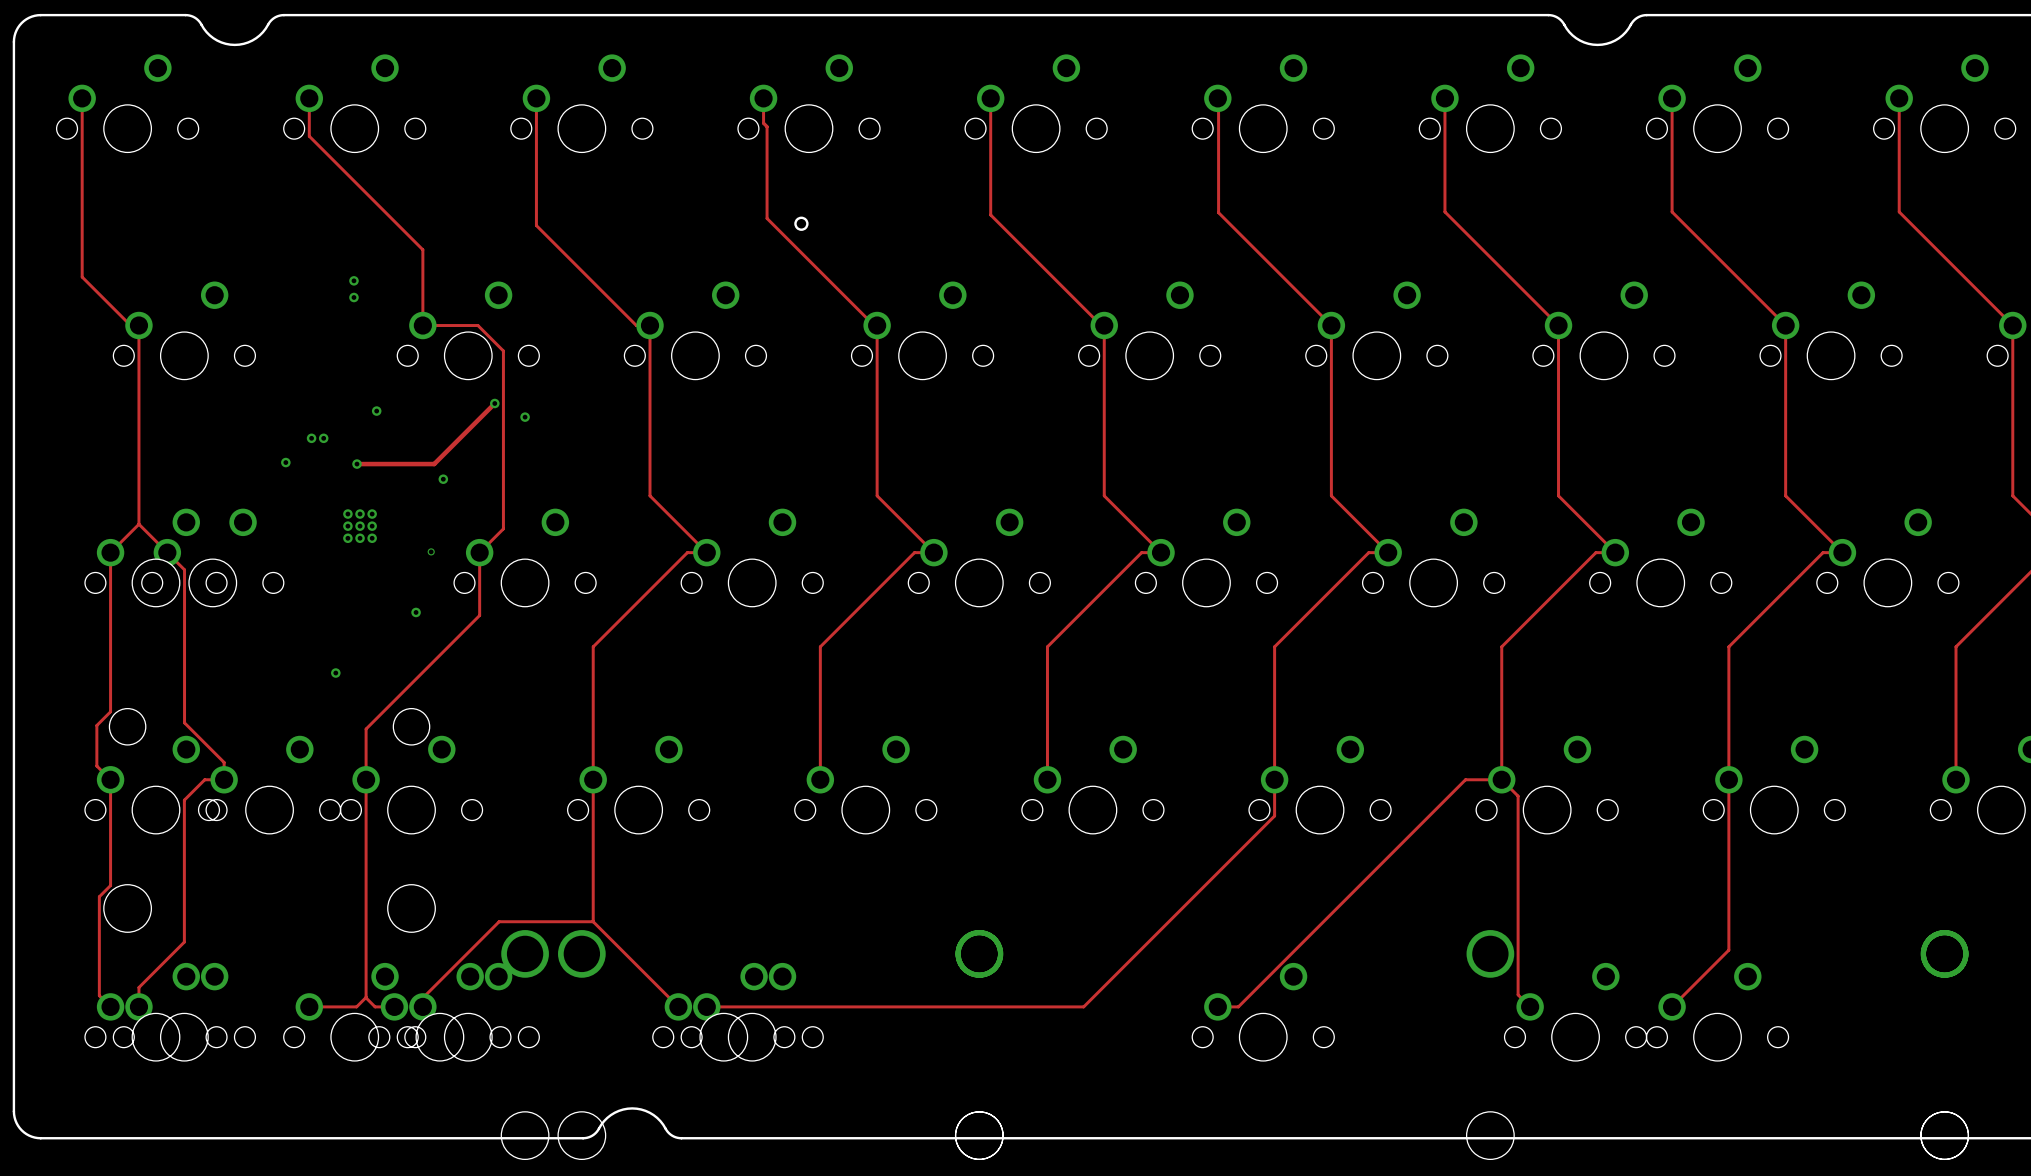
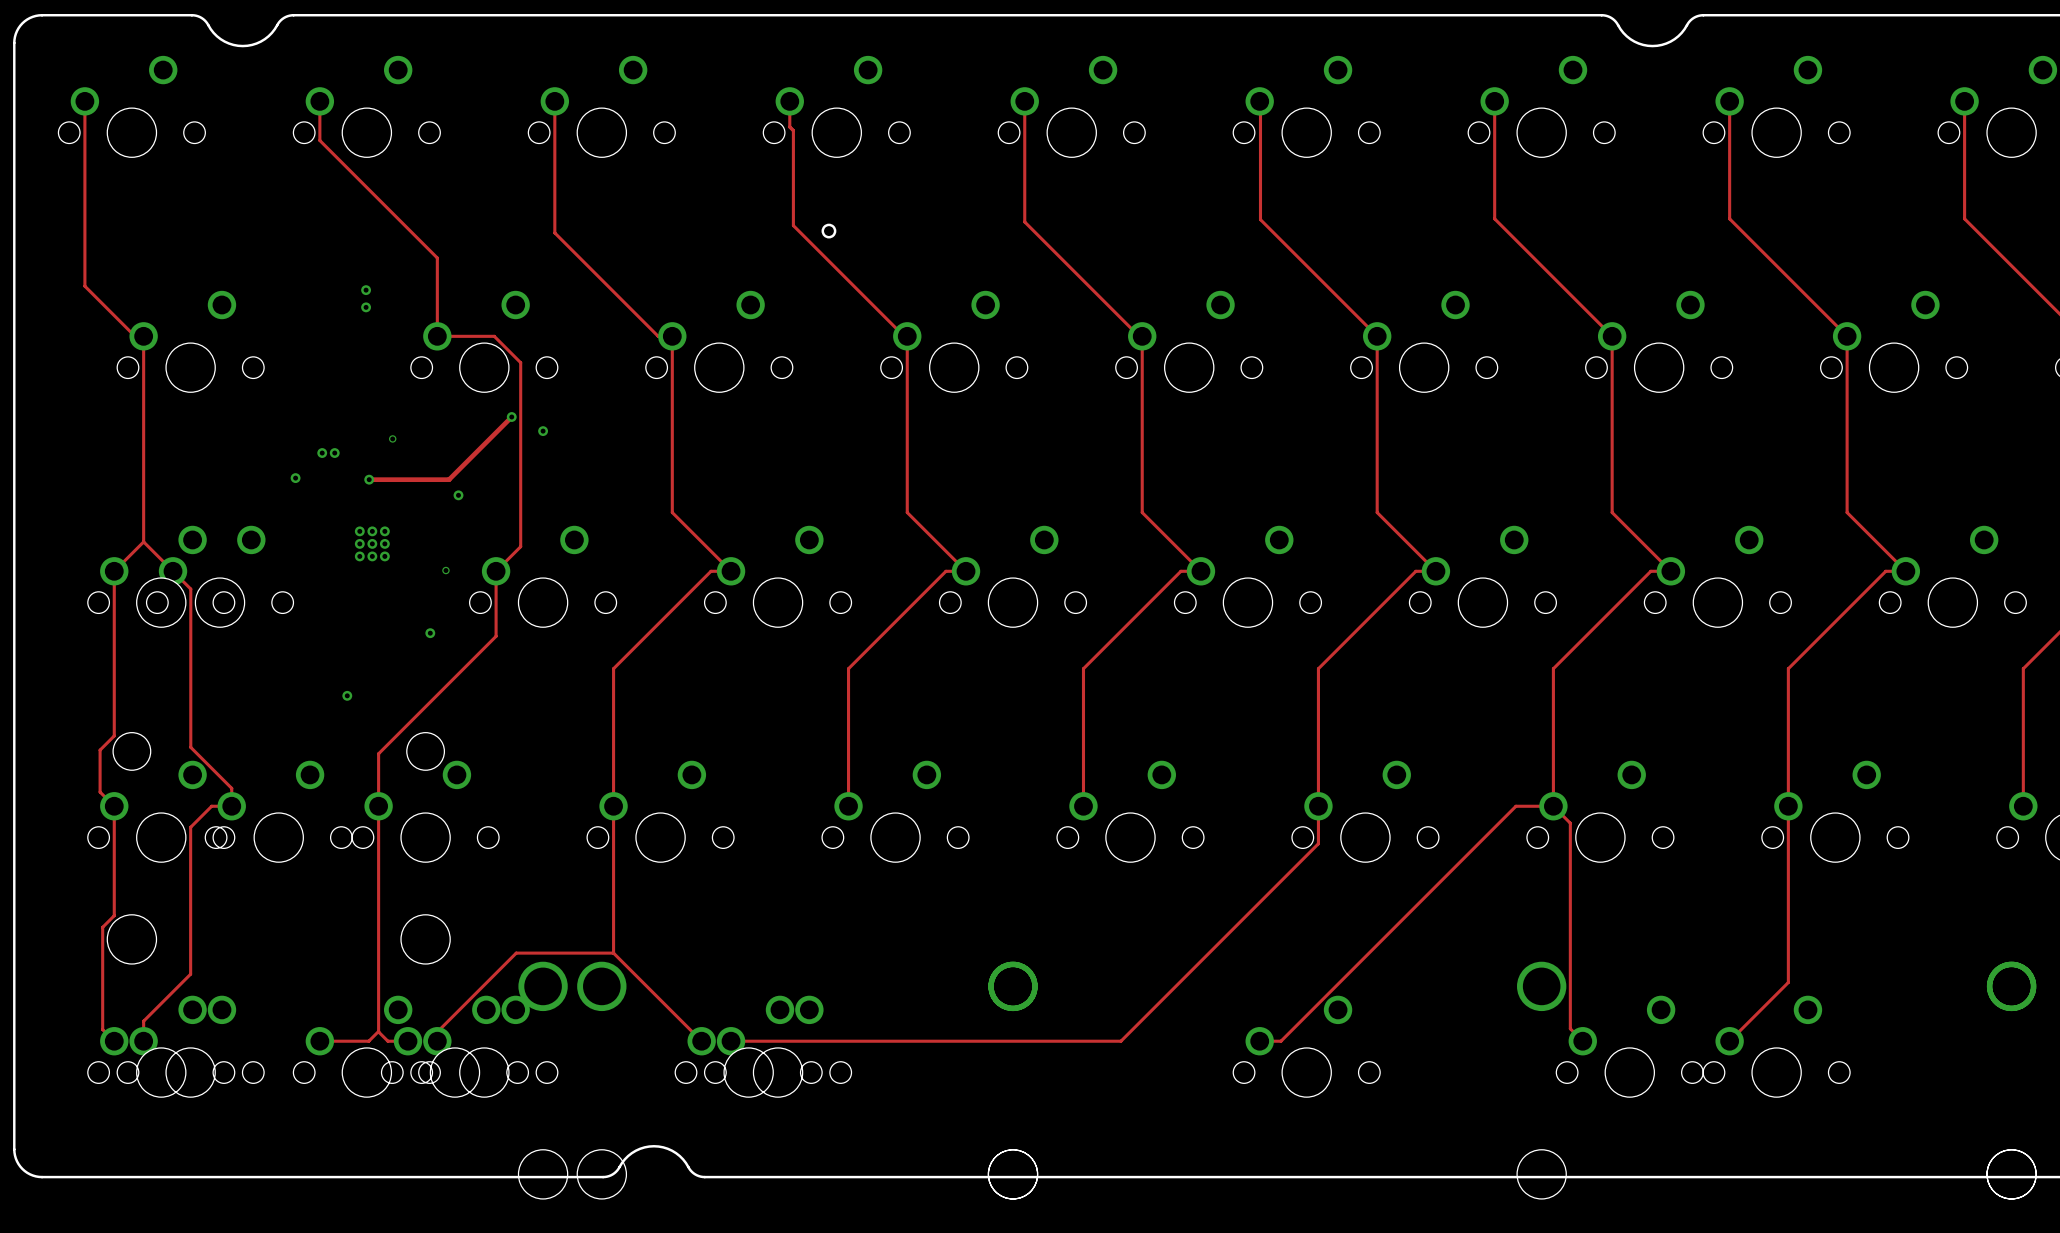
via: (376, 411) -> none
via: none -> (392, 438)

